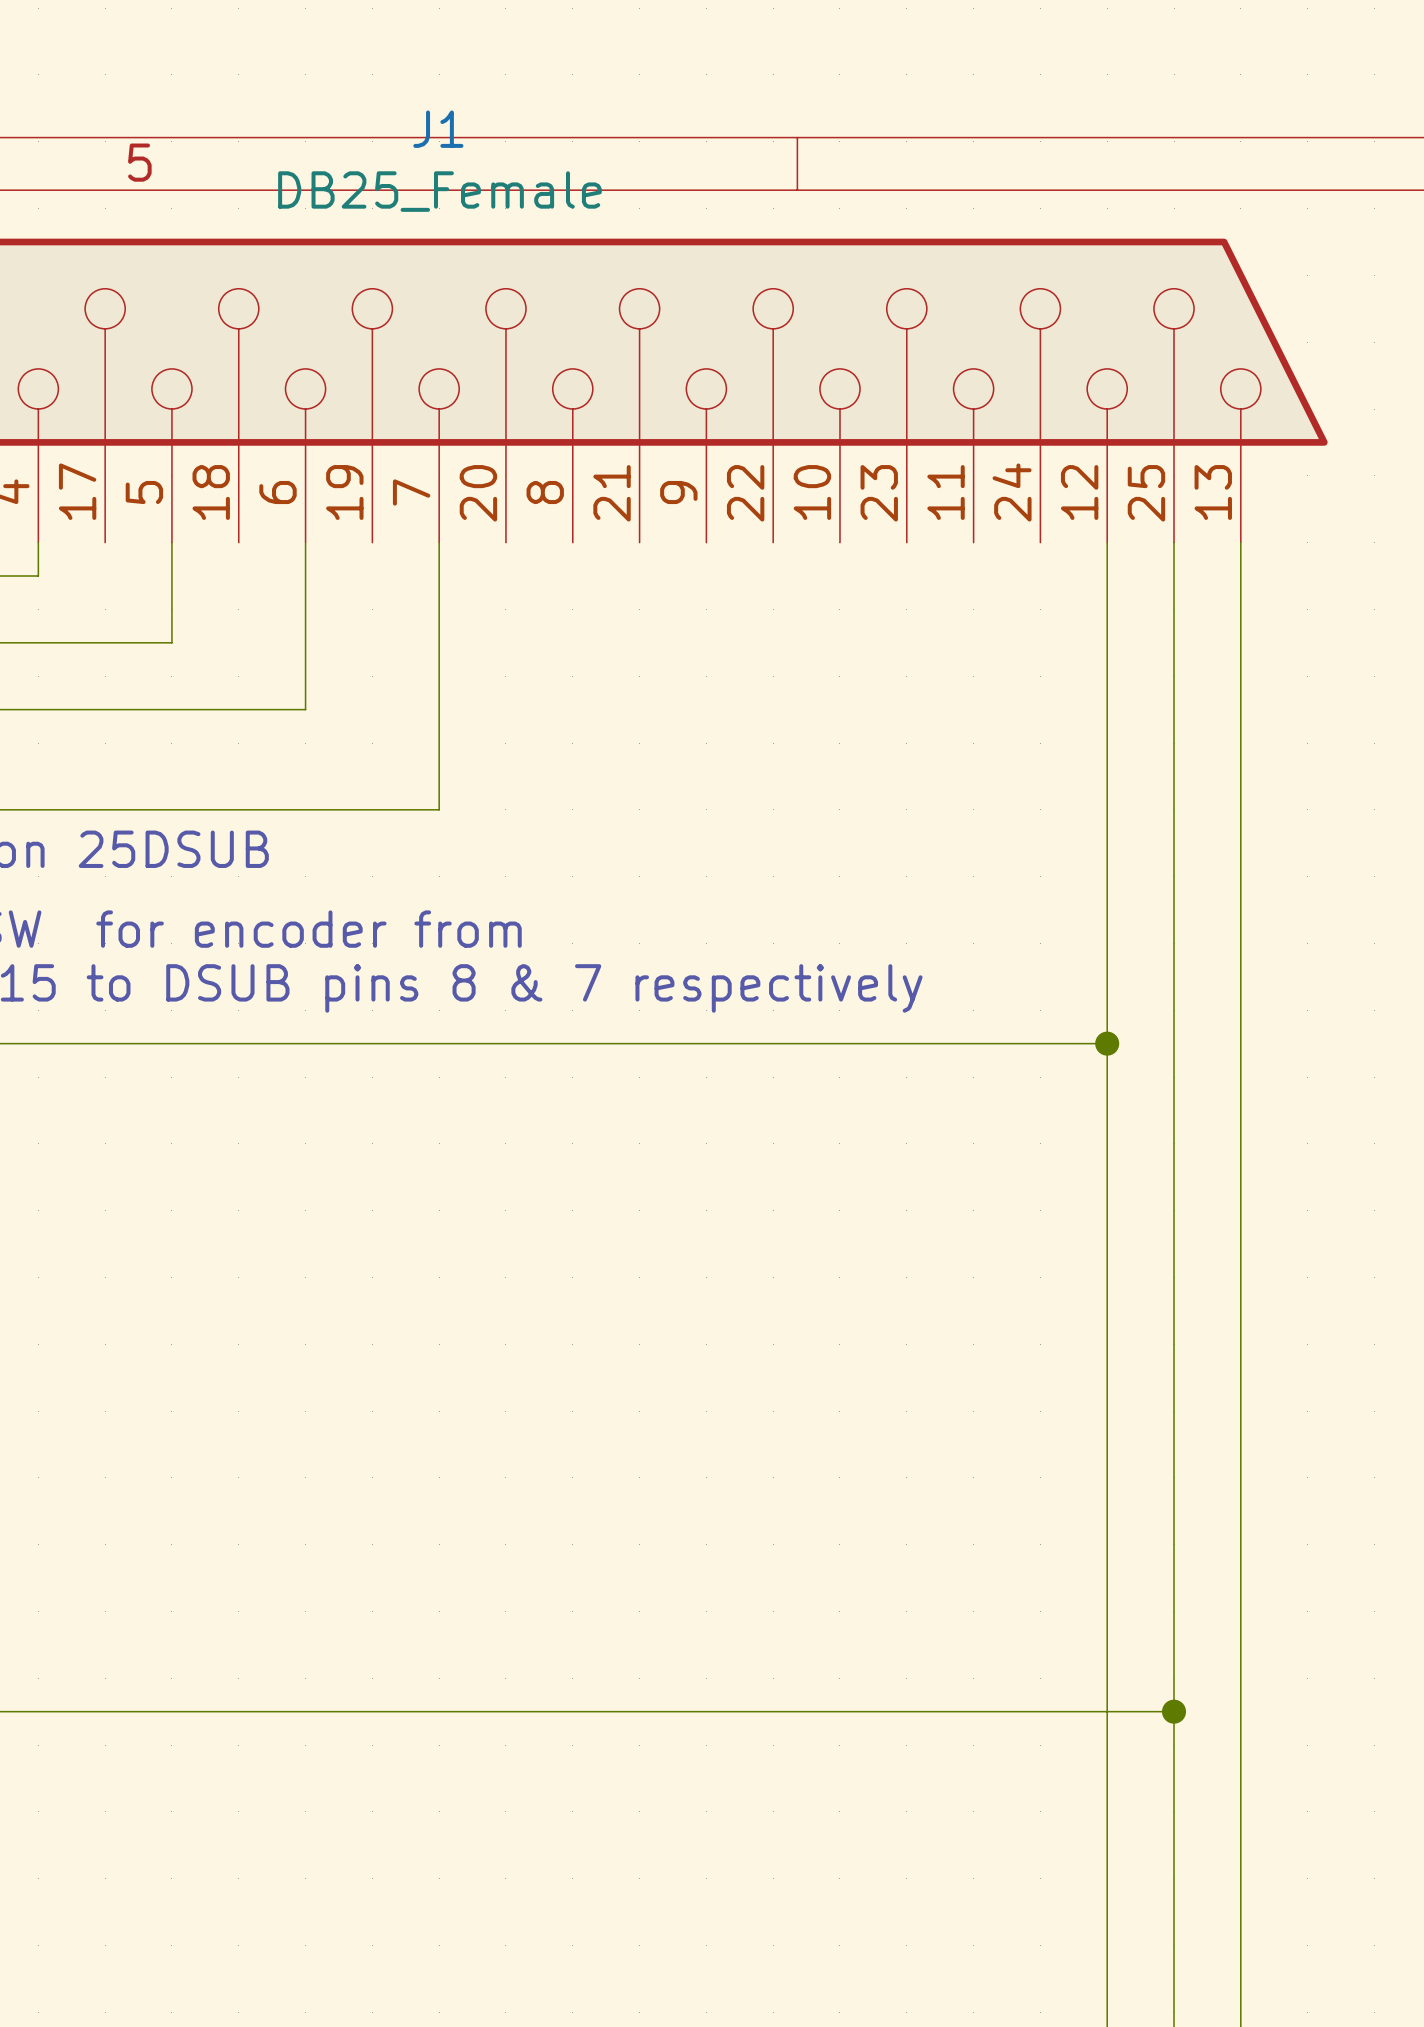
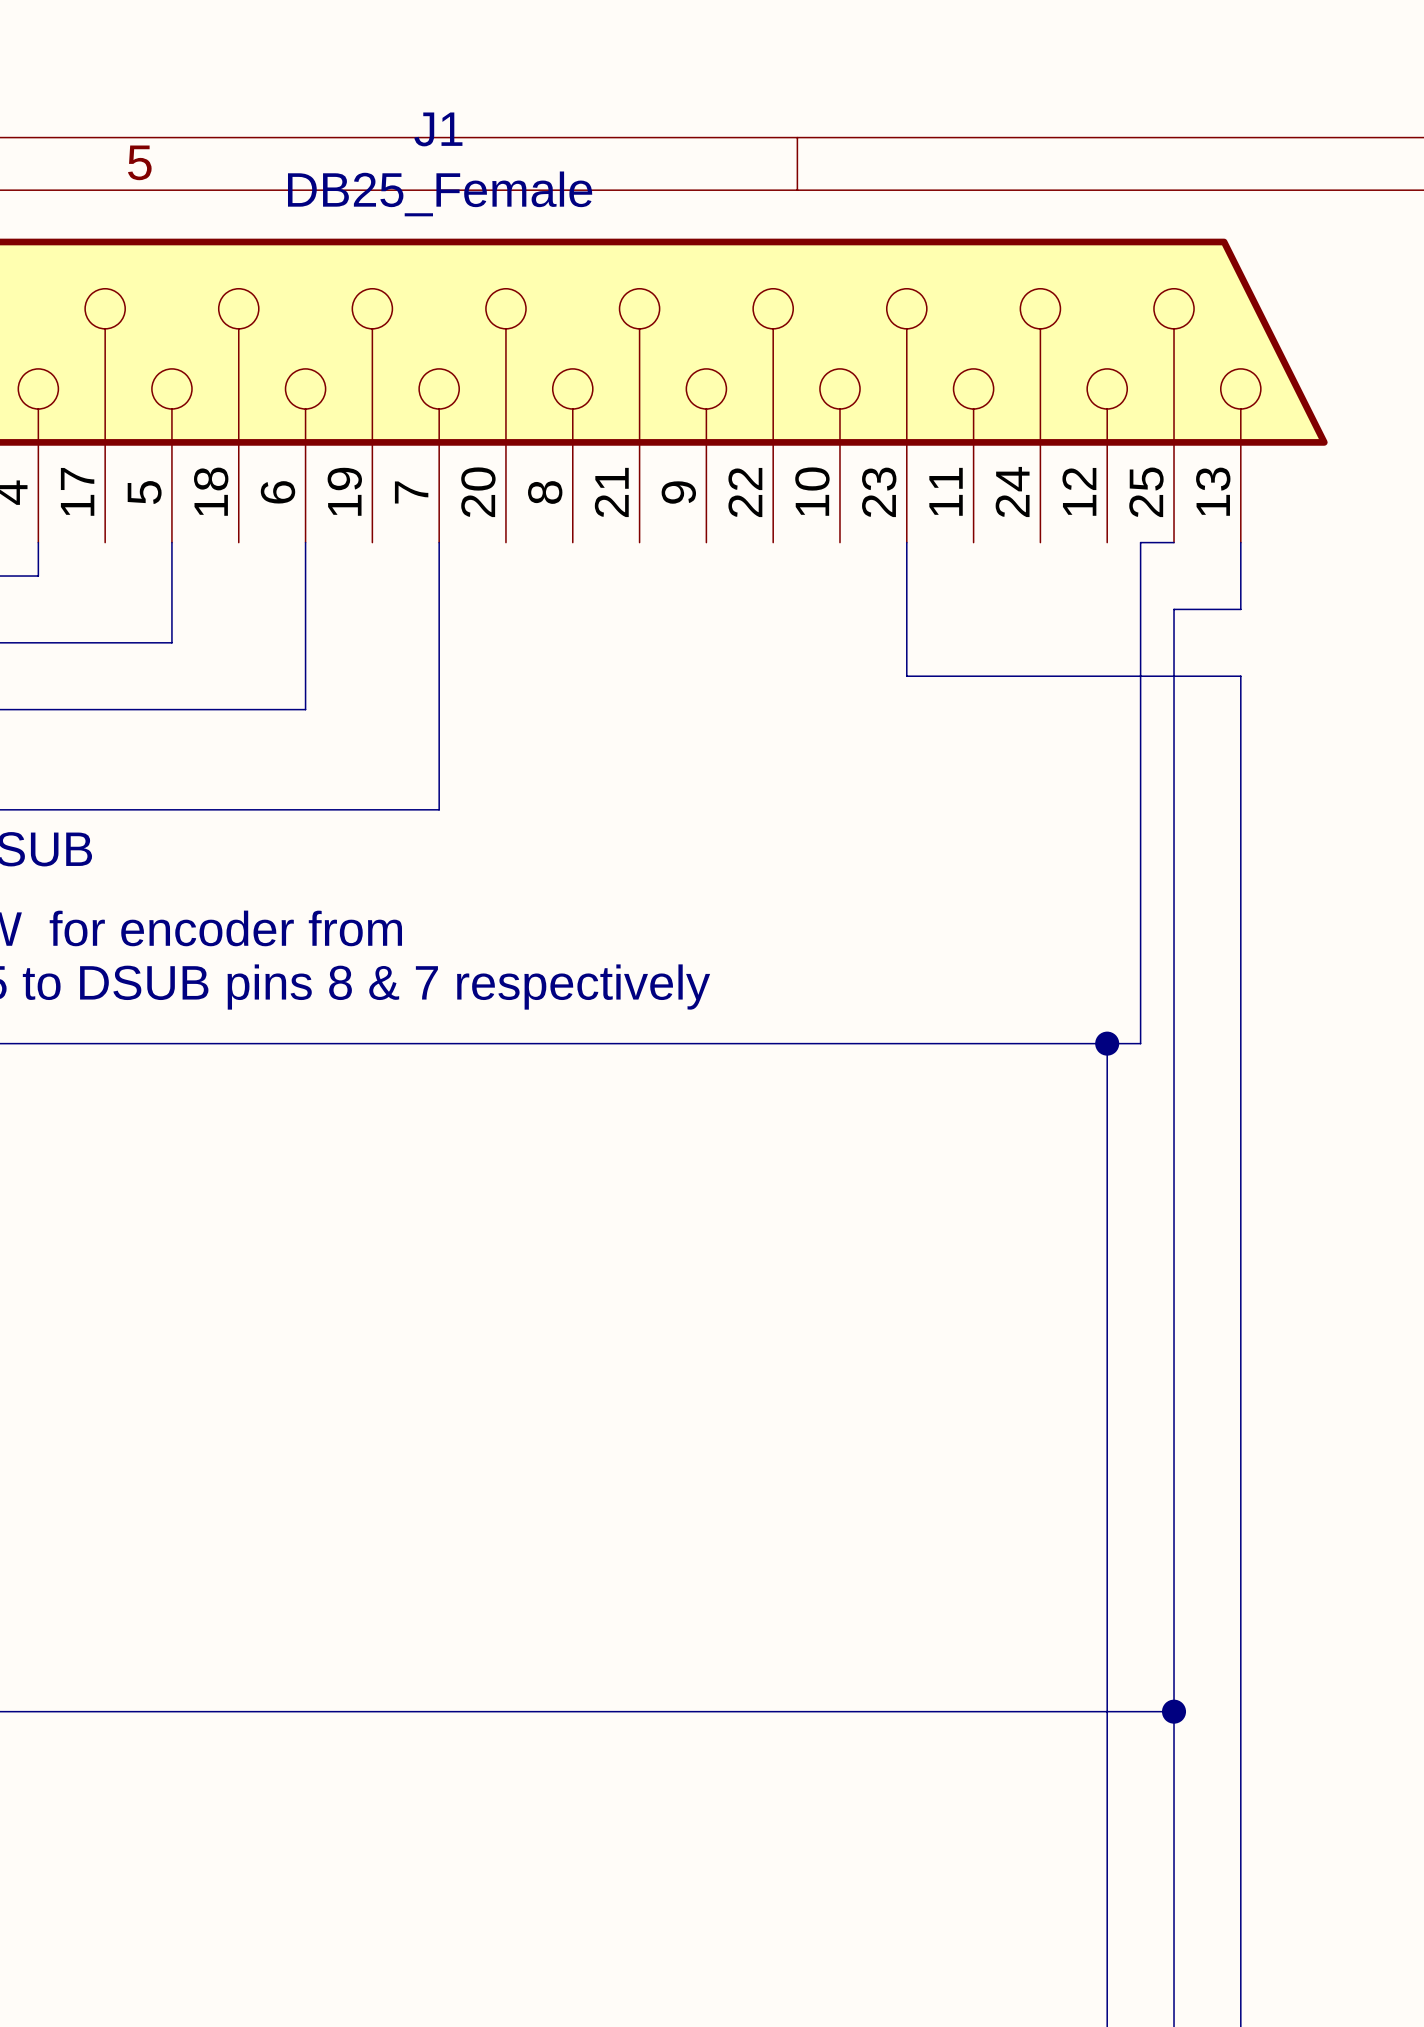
wire: none -> (906, 542) (906, 676) (1240, 676)
wire: (1107, 542) (1107, 1043) -> (1174, 542) (1140, 542) (1140, 1043) (1107, 1043)
wire: (1174, 542) (1174, 609) -> none
wire: (1240, 609) (1240, 676) -> (1240, 609) (1174, 609)

